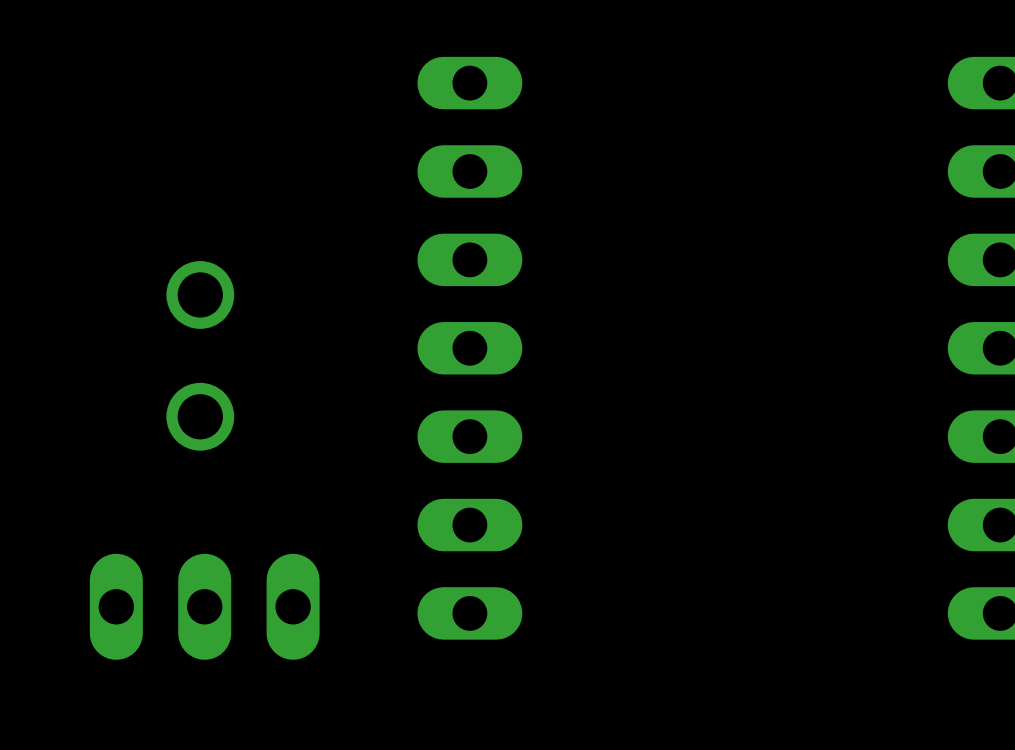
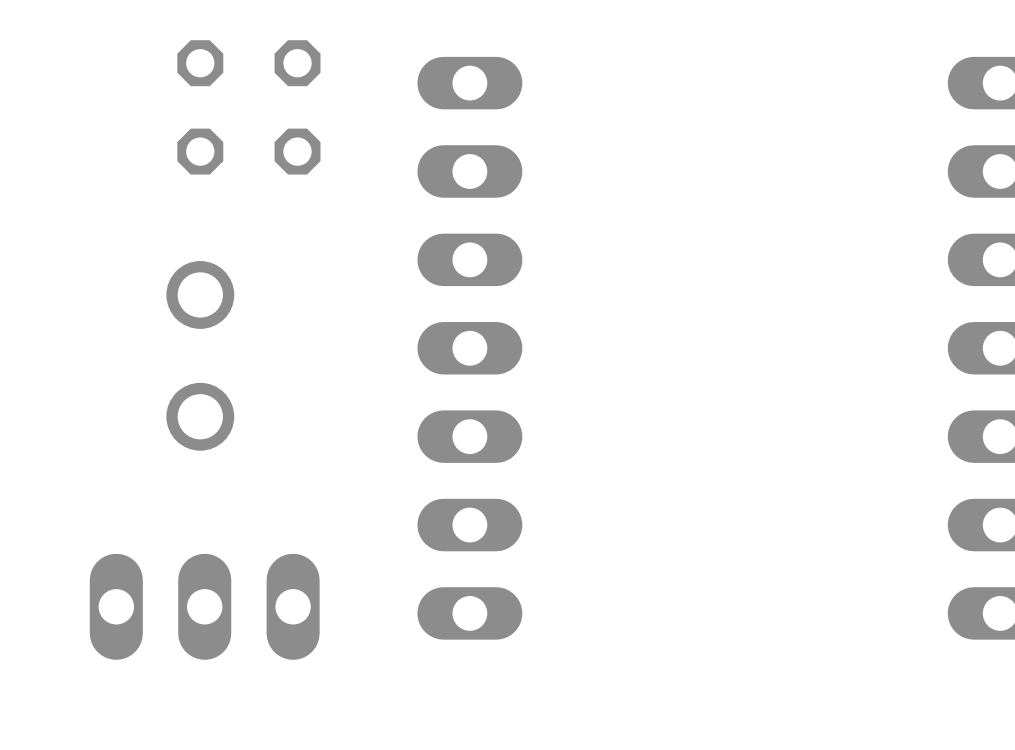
part: none -> (200, 107)
part: none -> (297, 107)

